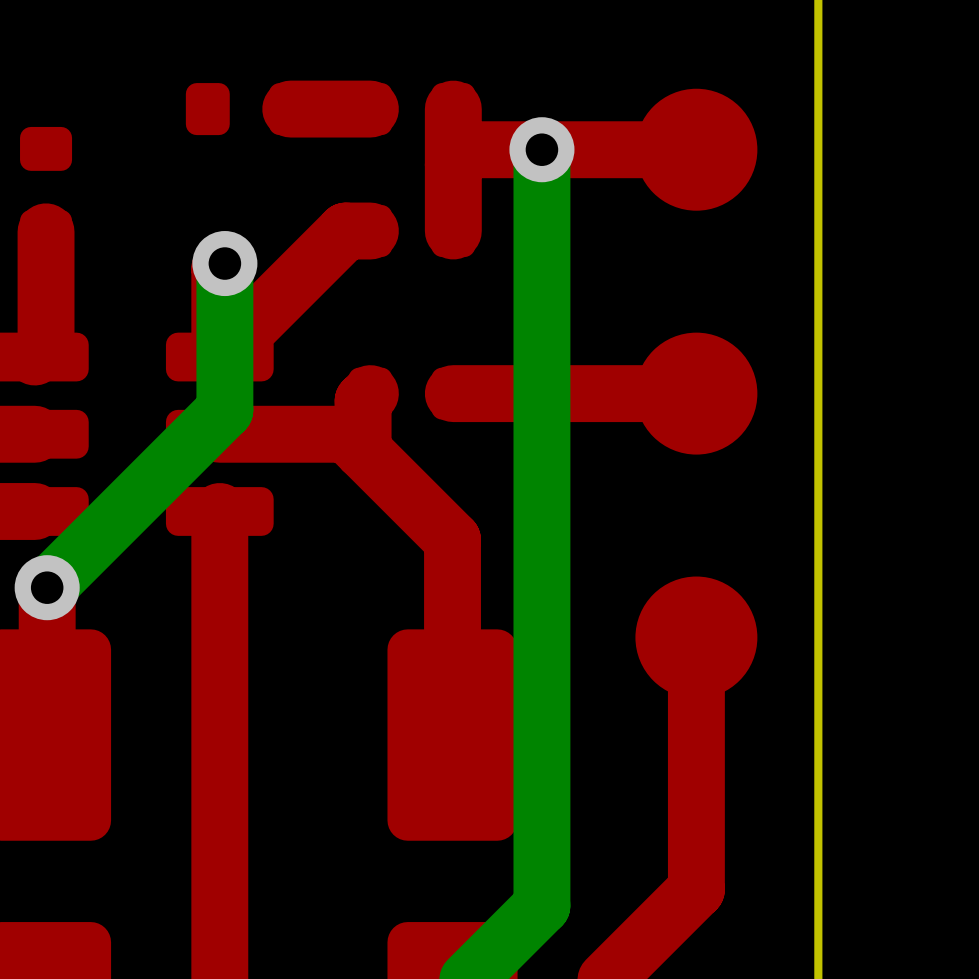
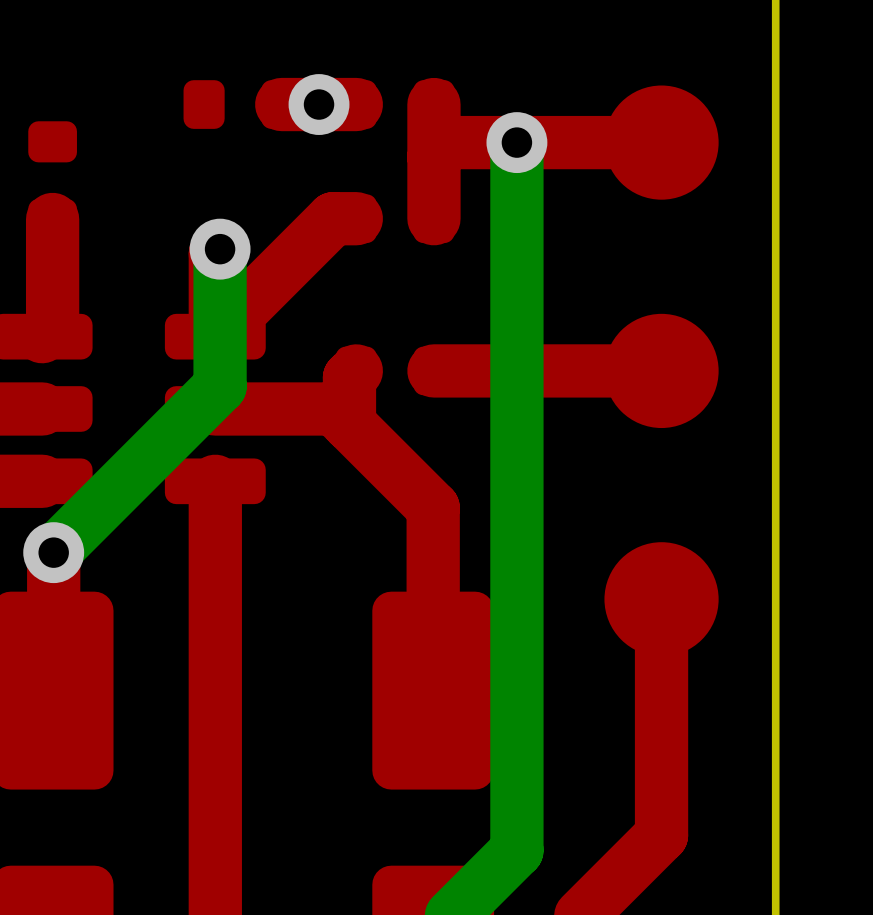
via: none -> (319, 104)

